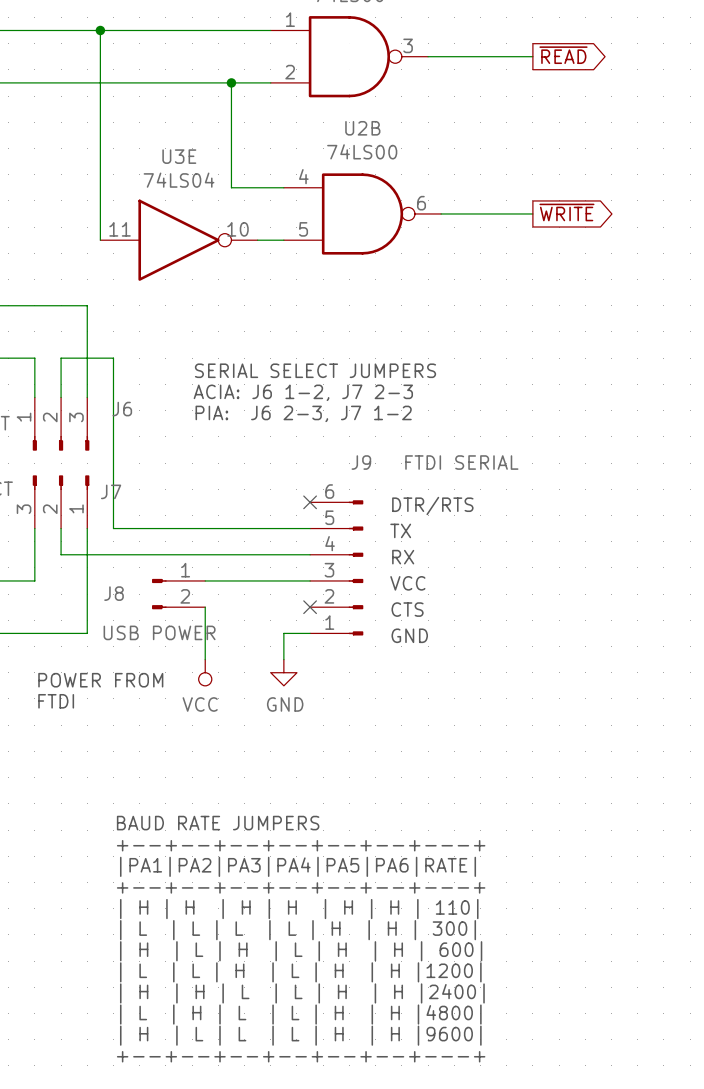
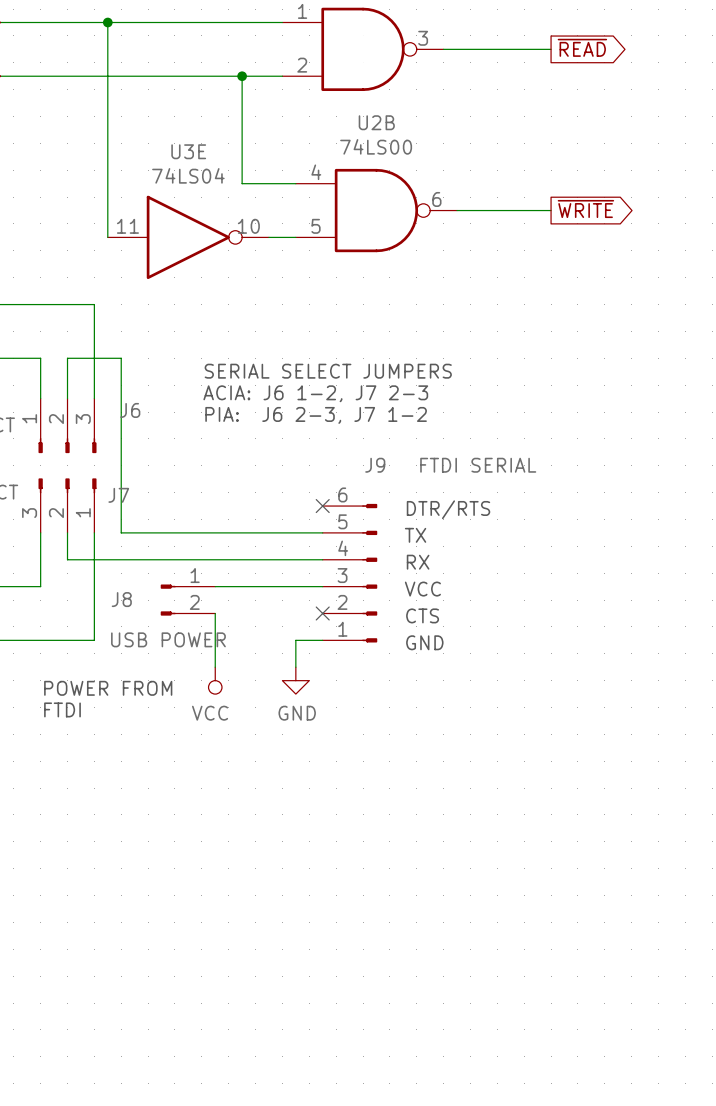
text: BAUD RATE JUMPERS (218, 823) -> none
text: +--+--+--+--+--+--+---+ (301, 845) -> none
text: |PA1|PA2|PA3|PA4|PA5|PA6|RATE| (298, 866) -> none
text: +--+--+--+--+--+--+---+ (301, 887) -> none
text: | H | H | H | H | H | H | 110| (299, 909) -> none
text: | L | L | L | L | H | H | 300| (298, 930) -> none
text: | H | L | H | L | H | H | 600| (301, 951) -> none
text: | L | L | H | L | H | H |1200| (300, 972) -> none
text: | H | H | L | L | H | H |2400| (302, 993) -> none
text: | L | H | L | L | H | H |4800| (300, 1014) -> none
text: | H | L | L | L | H | H |9600| (300, 1035) -> none
text: +--+--+--+--+--+--+---+ (301, 1056) -> none

